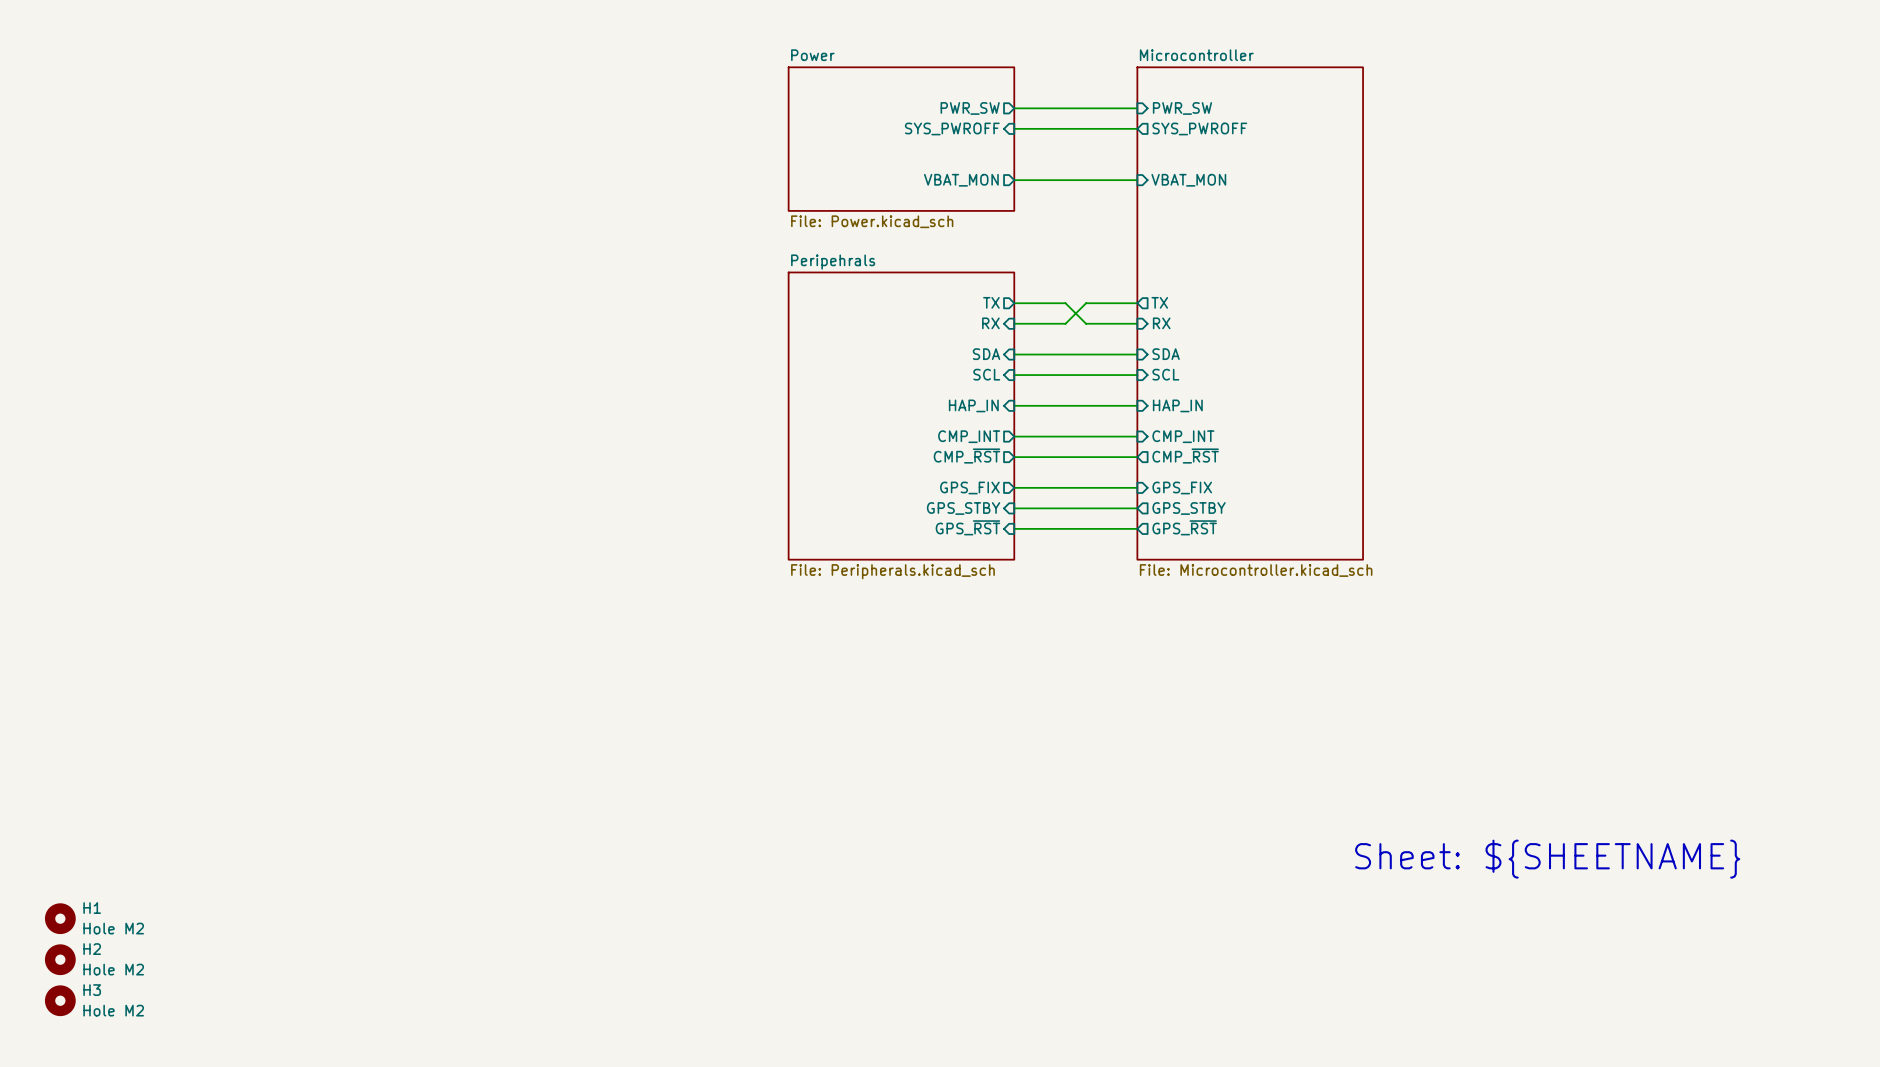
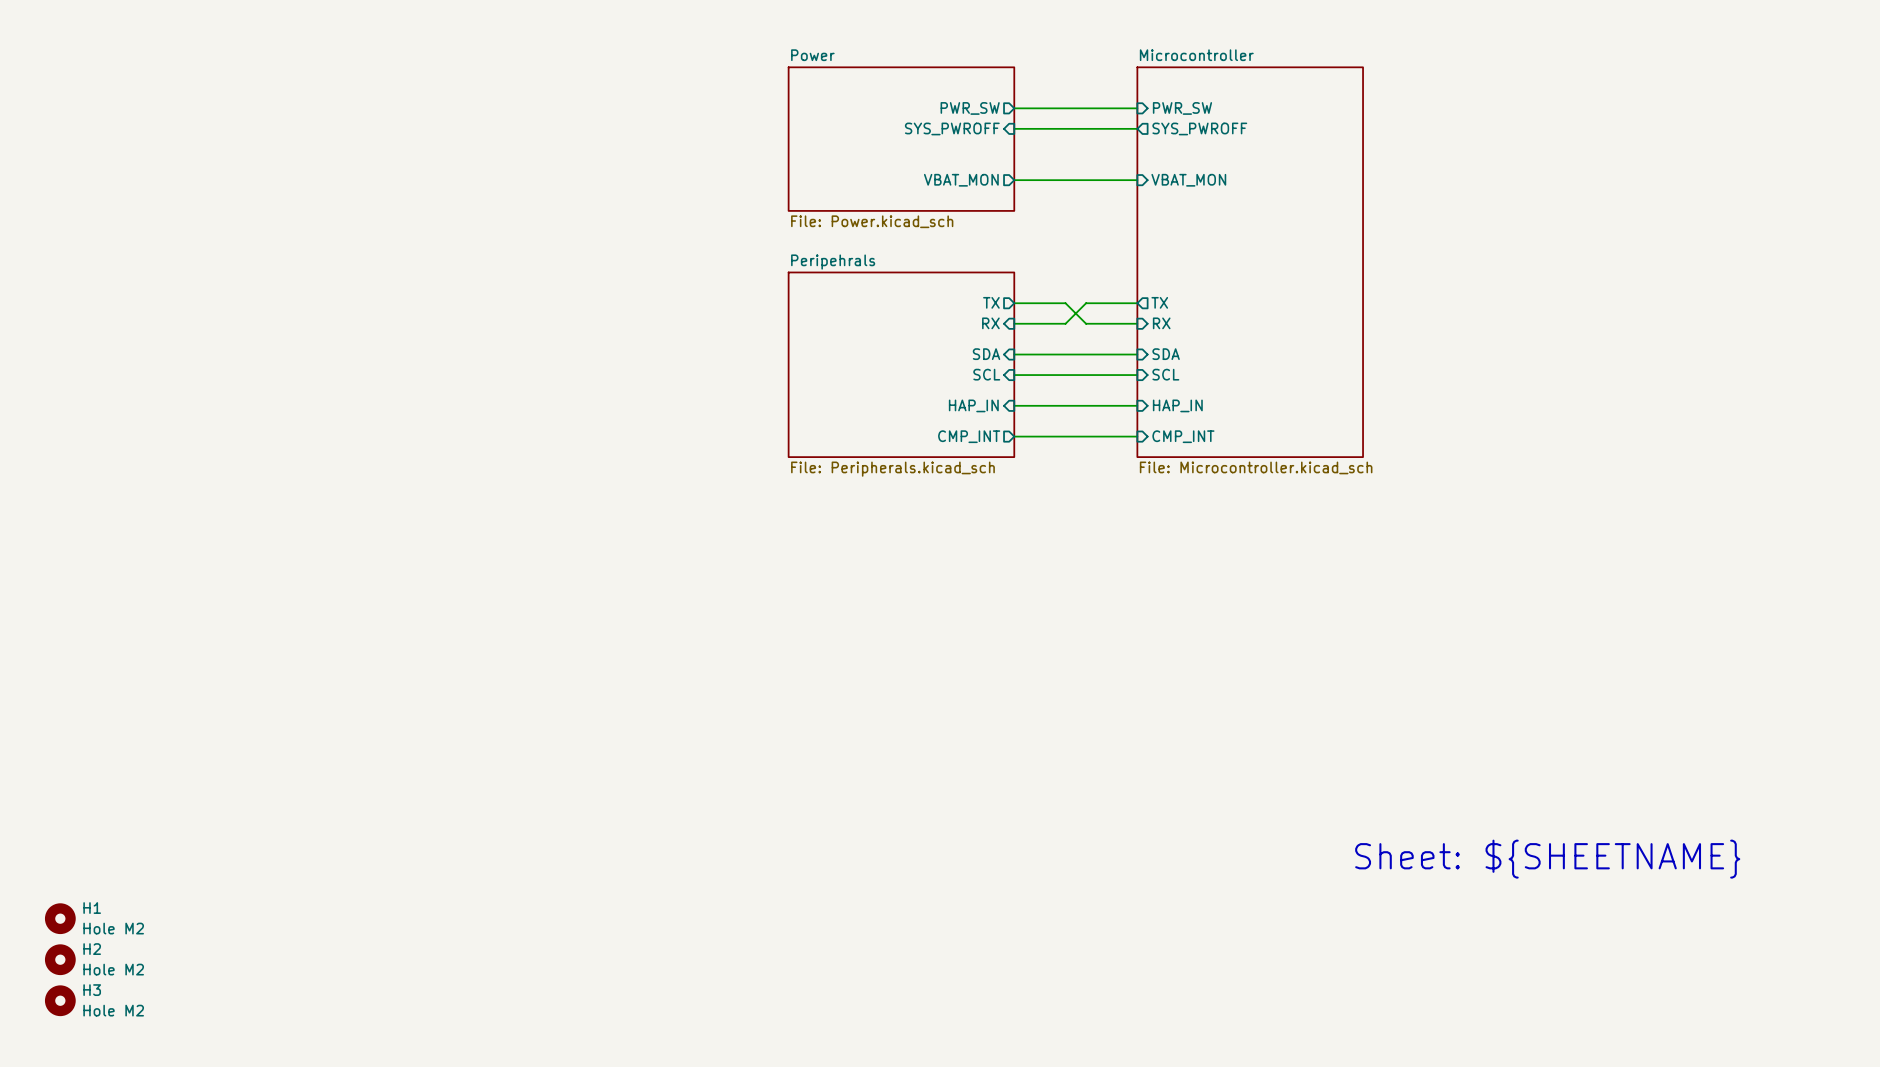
sheet Microcontroller: none -> File: Microcontroller.kicad_sch (1250, 262)
sheet Microcontroller: File: Microcontroller.kicad_sch (1250, 313) -> none
sheet Peripehrals: none -> File: Peripherals.kicad_sch (901, 364)
sheet Peripehrals: File: Peripherals.kicad_sch (901, 416) -> none
sheet pin: CMP_~{RST} (966, 456) -> none
sheet pin: CMP_~{RST} (1185, 456) -> none
wire: (1014, 457) (1137, 457) -> none
sheet pin: GPS_FIX (969, 487) -> none
wire: (1014, 487) (1137, 487) -> none
sheet pin: GPS_FIX (1182, 487) -> none
sheet pin: GPS_STBY (963, 508) -> none
wire: (1014, 508) (1137, 508) -> none
sheet pin: GPS_STBY (1189, 508) -> none
sheet pin: GPS_~{RST} (967, 527) -> none
sheet pin: GPS_~{RST} (1184, 527) -> none
wire: (1014, 528) (1137, 528) -> none

